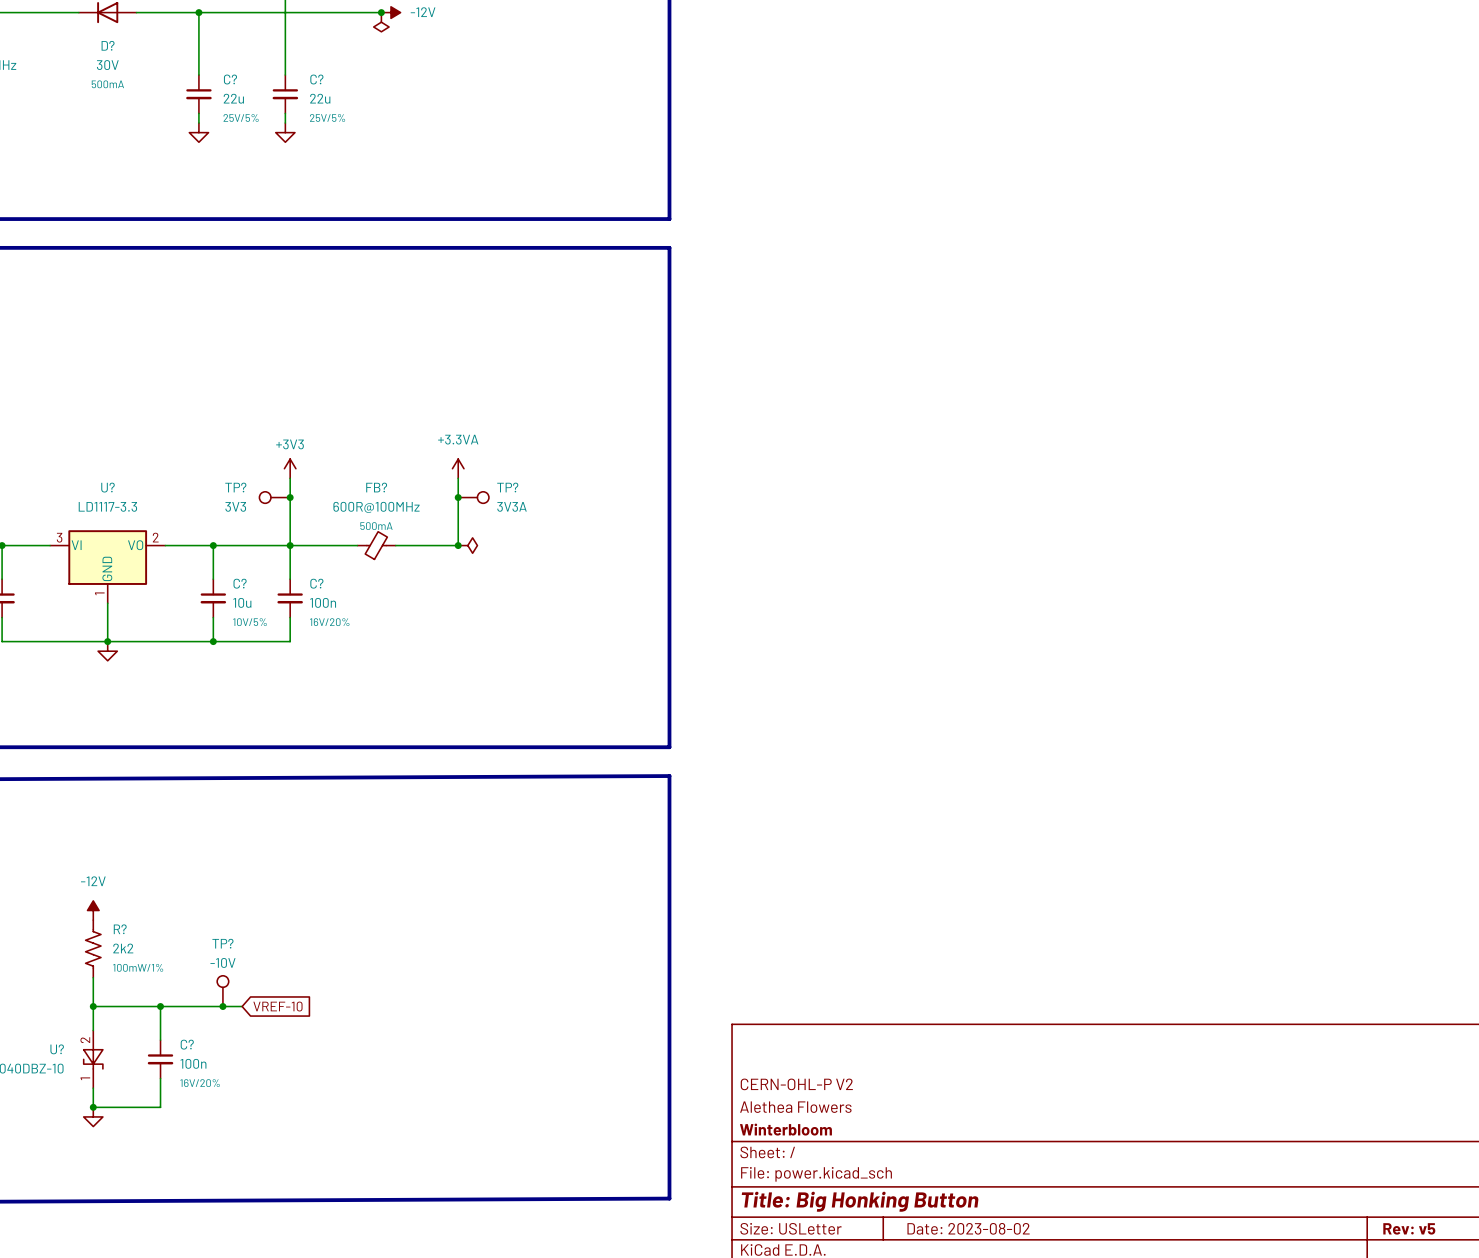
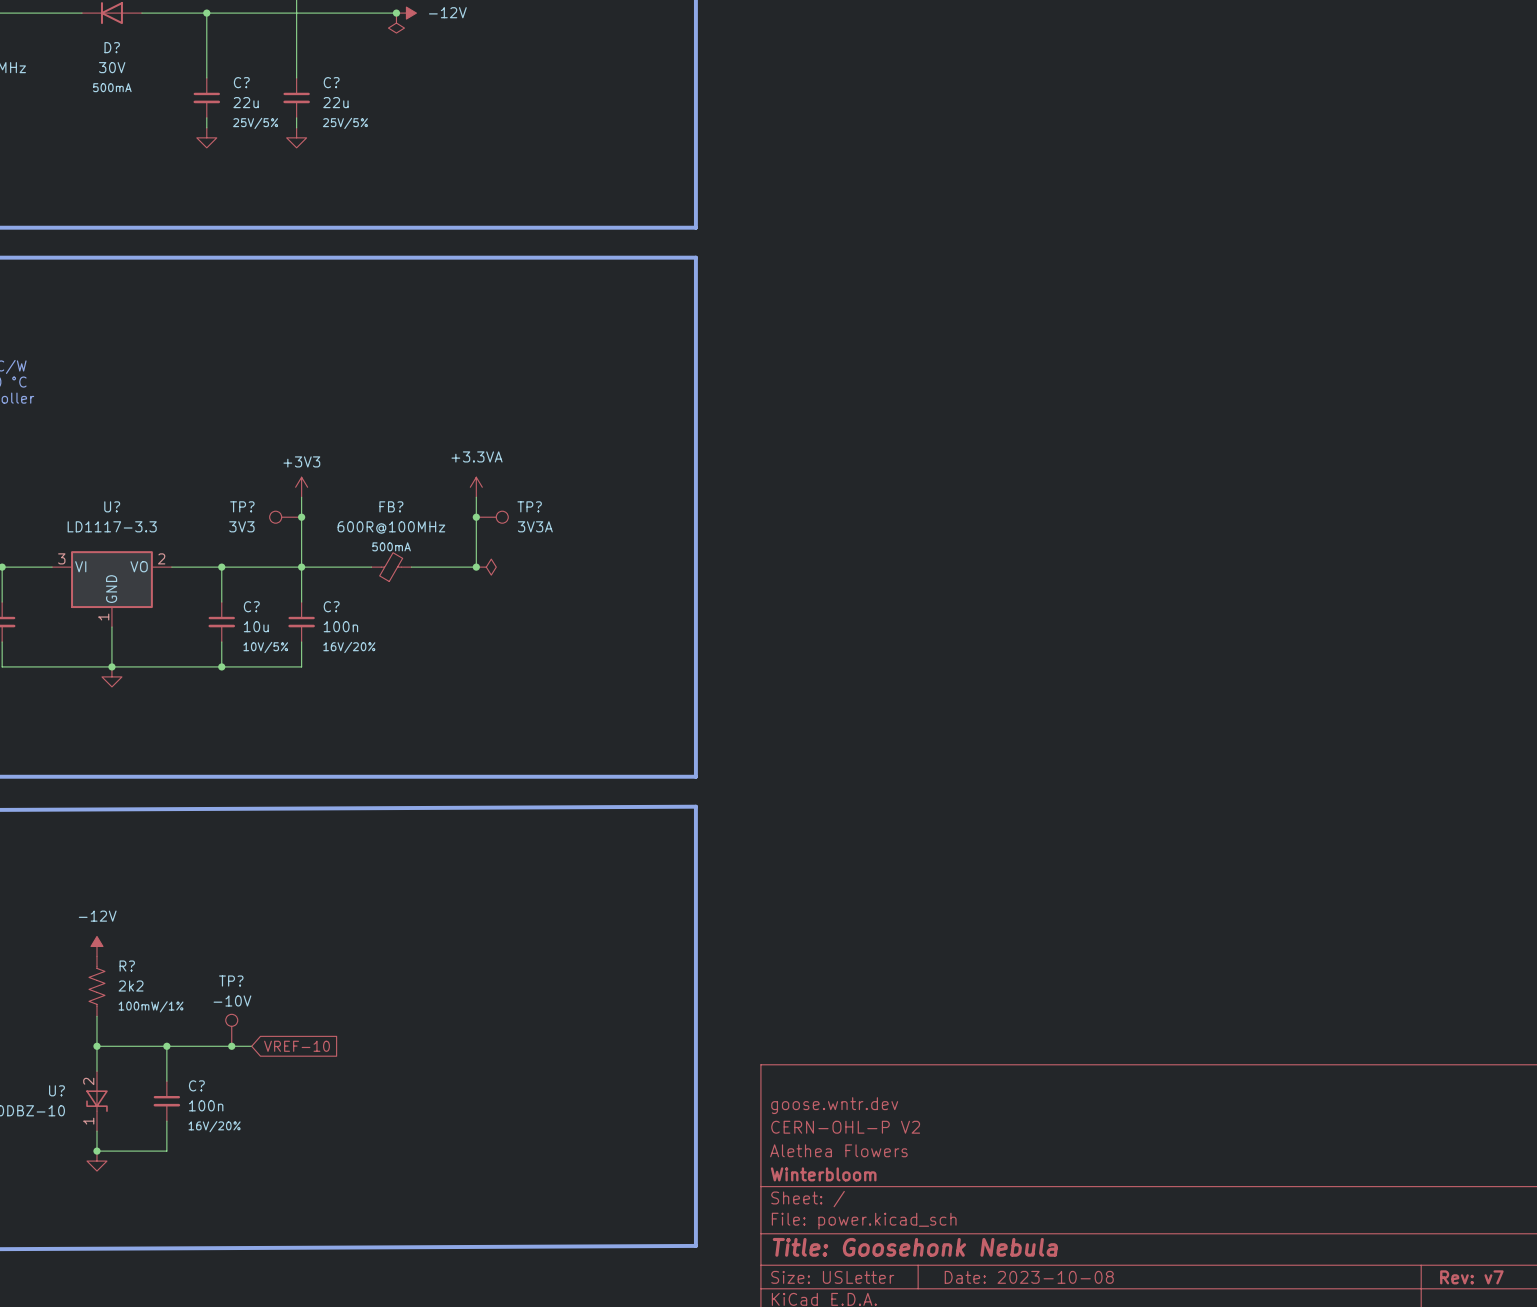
title block: none -> goose.wntr.dev (834, 1105)
title block: Title: Big Honking Button (860, 1201) -> Title: Goosehonk Nebula (915, 1247)
title block: Date: 2023-08-02 (968, 1228) -> Date: 2023-10-08 (1029, 1277)
title block: Rev: v5 (1409, 1228) -> Rev: v7 (1471, 1277)

